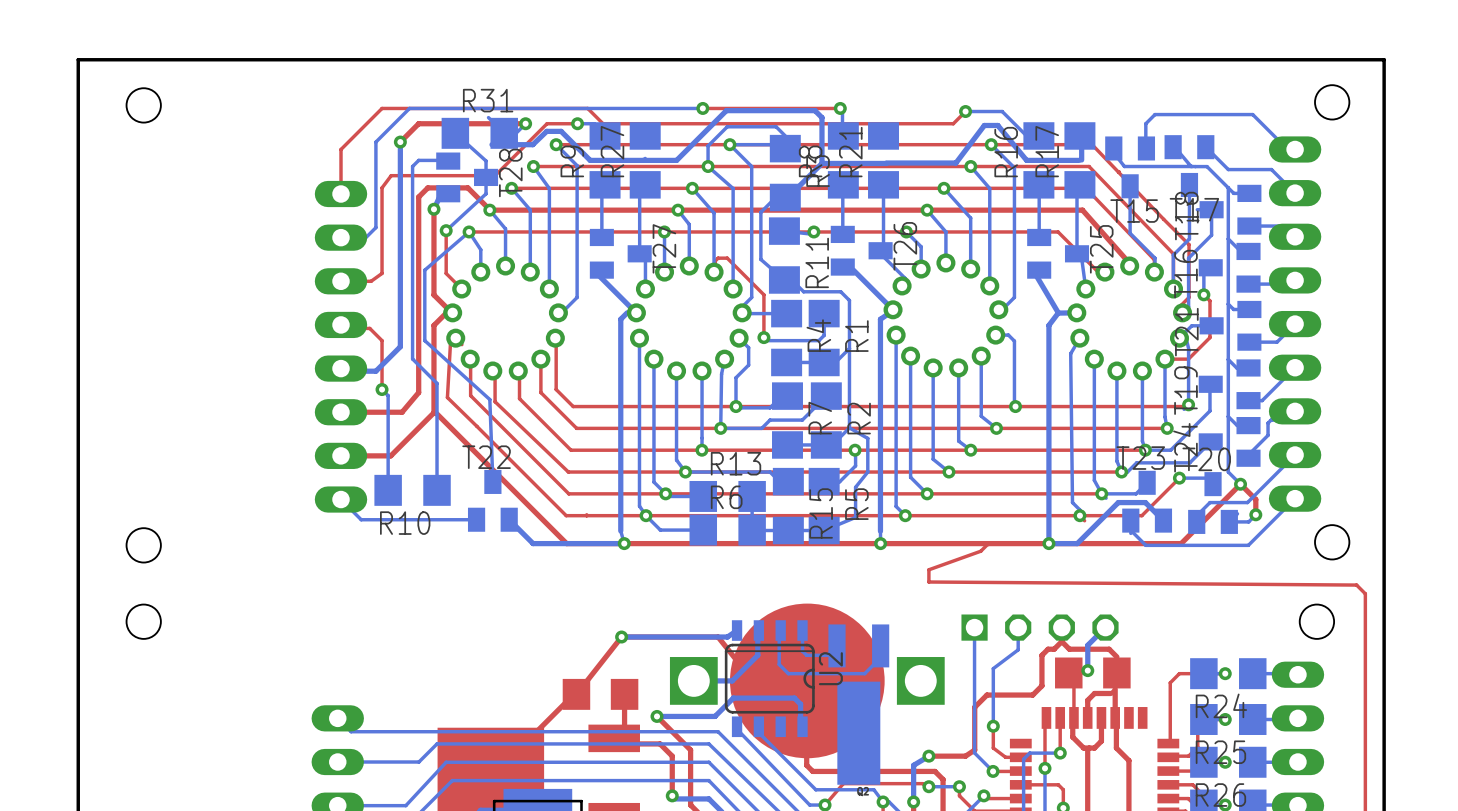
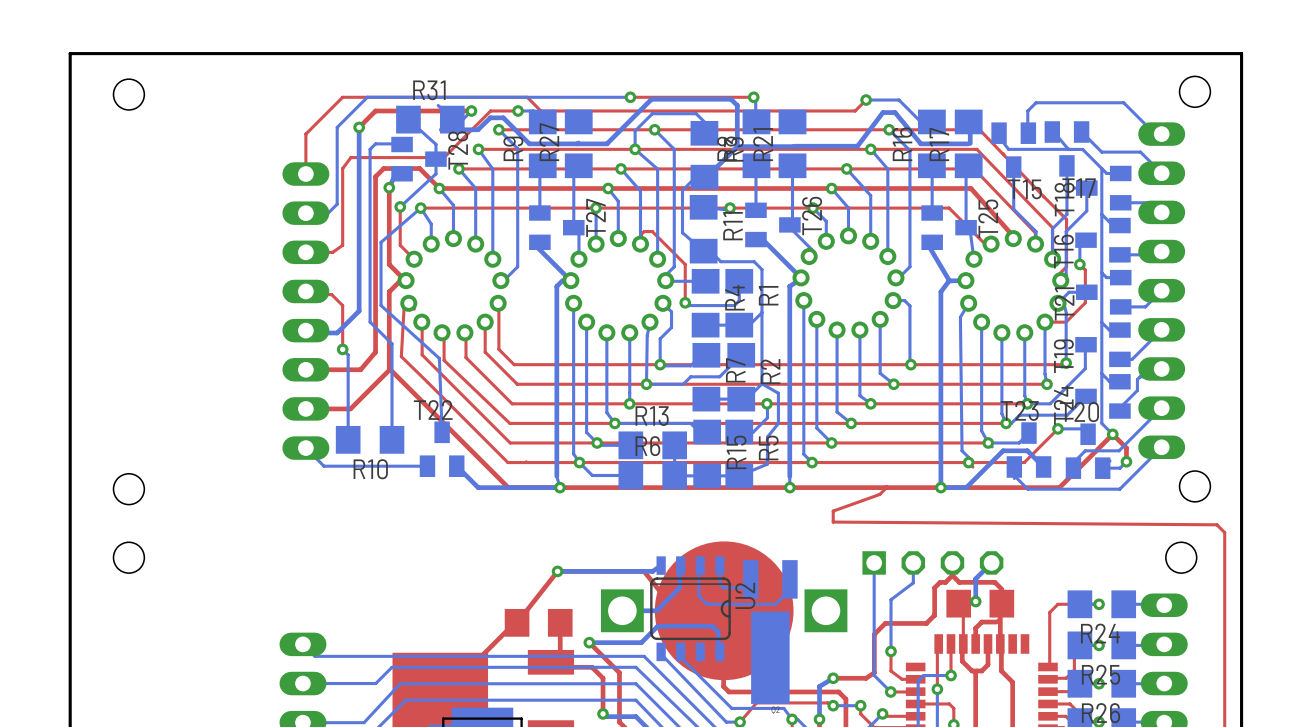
bottom track: (785, 144) (729, 144) -> none

